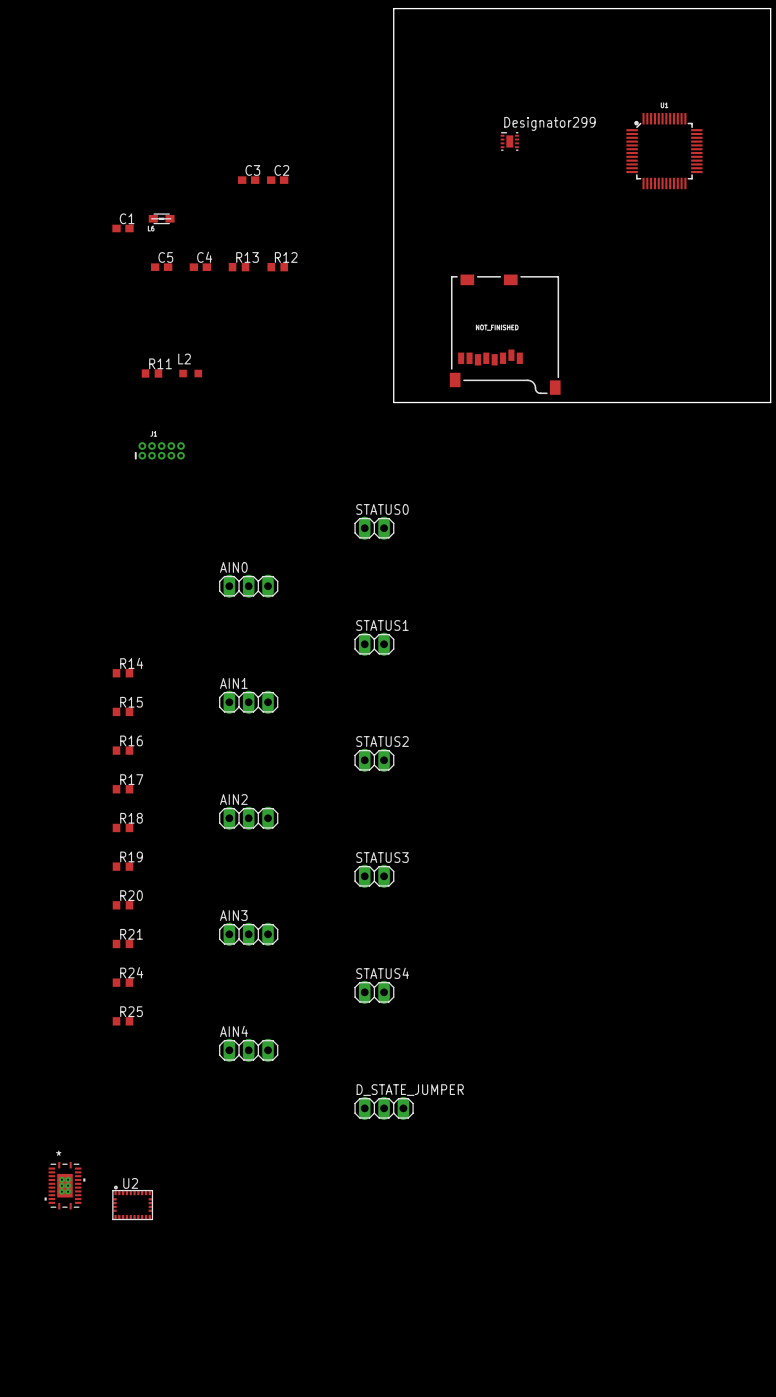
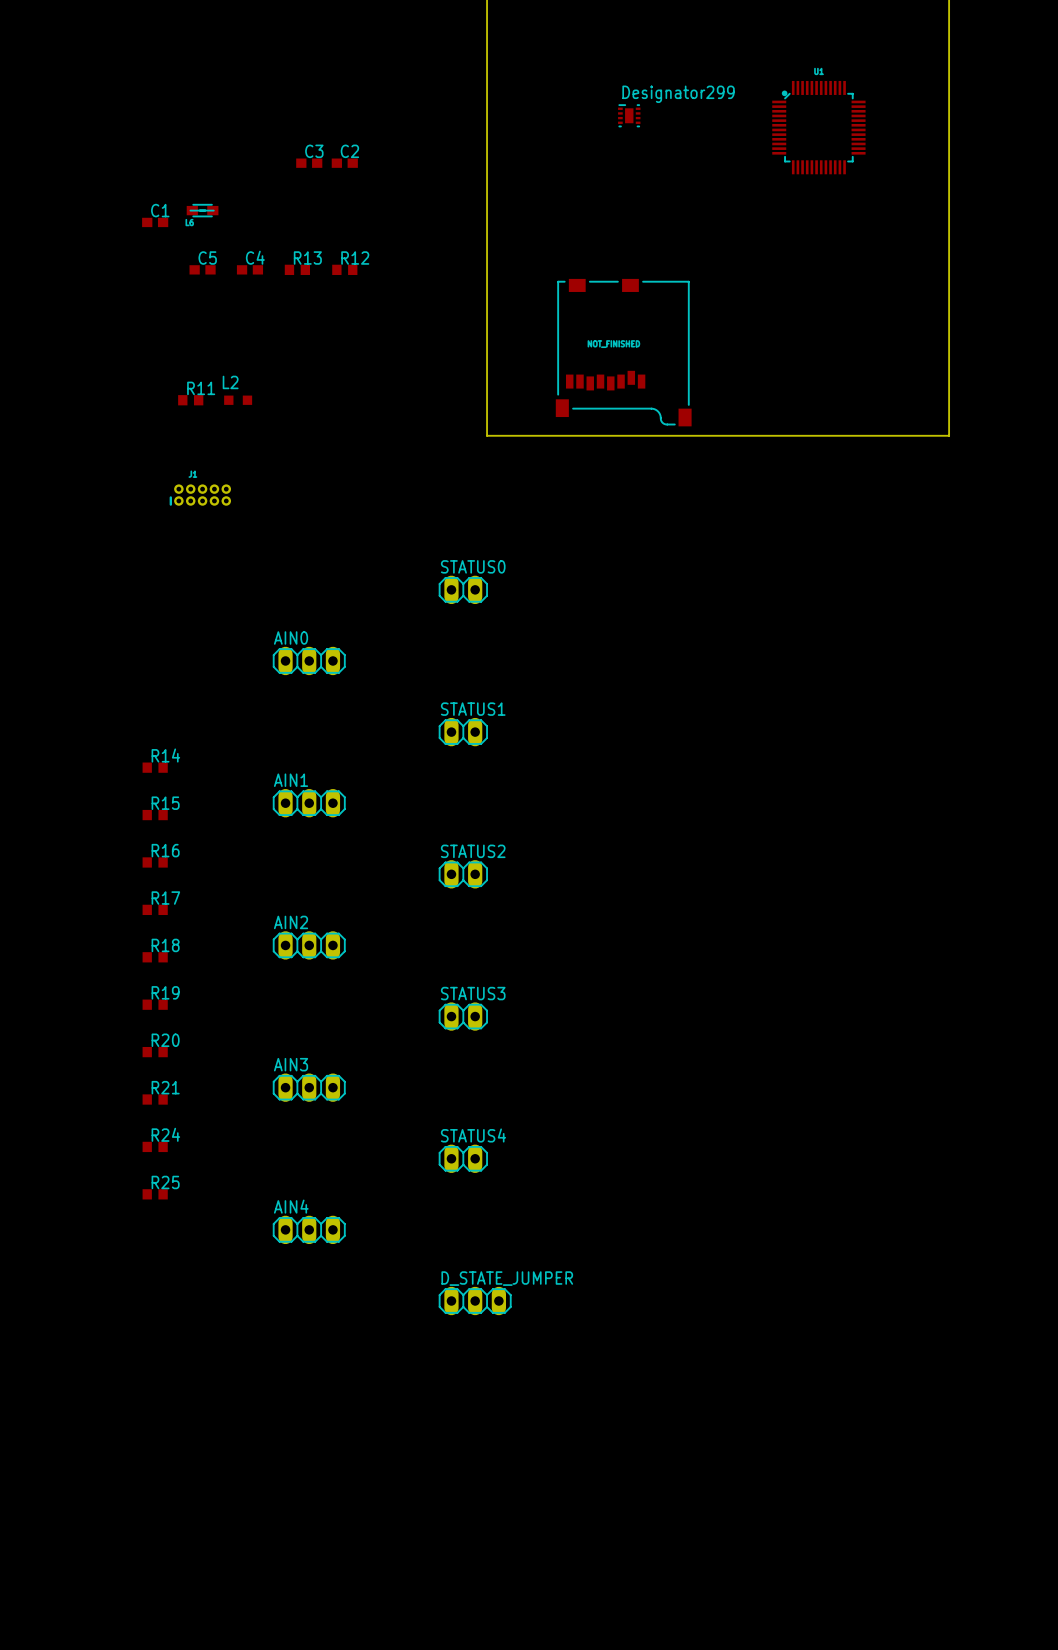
part: (64, 1185) -> none
U2: (132, 1202) -> none

